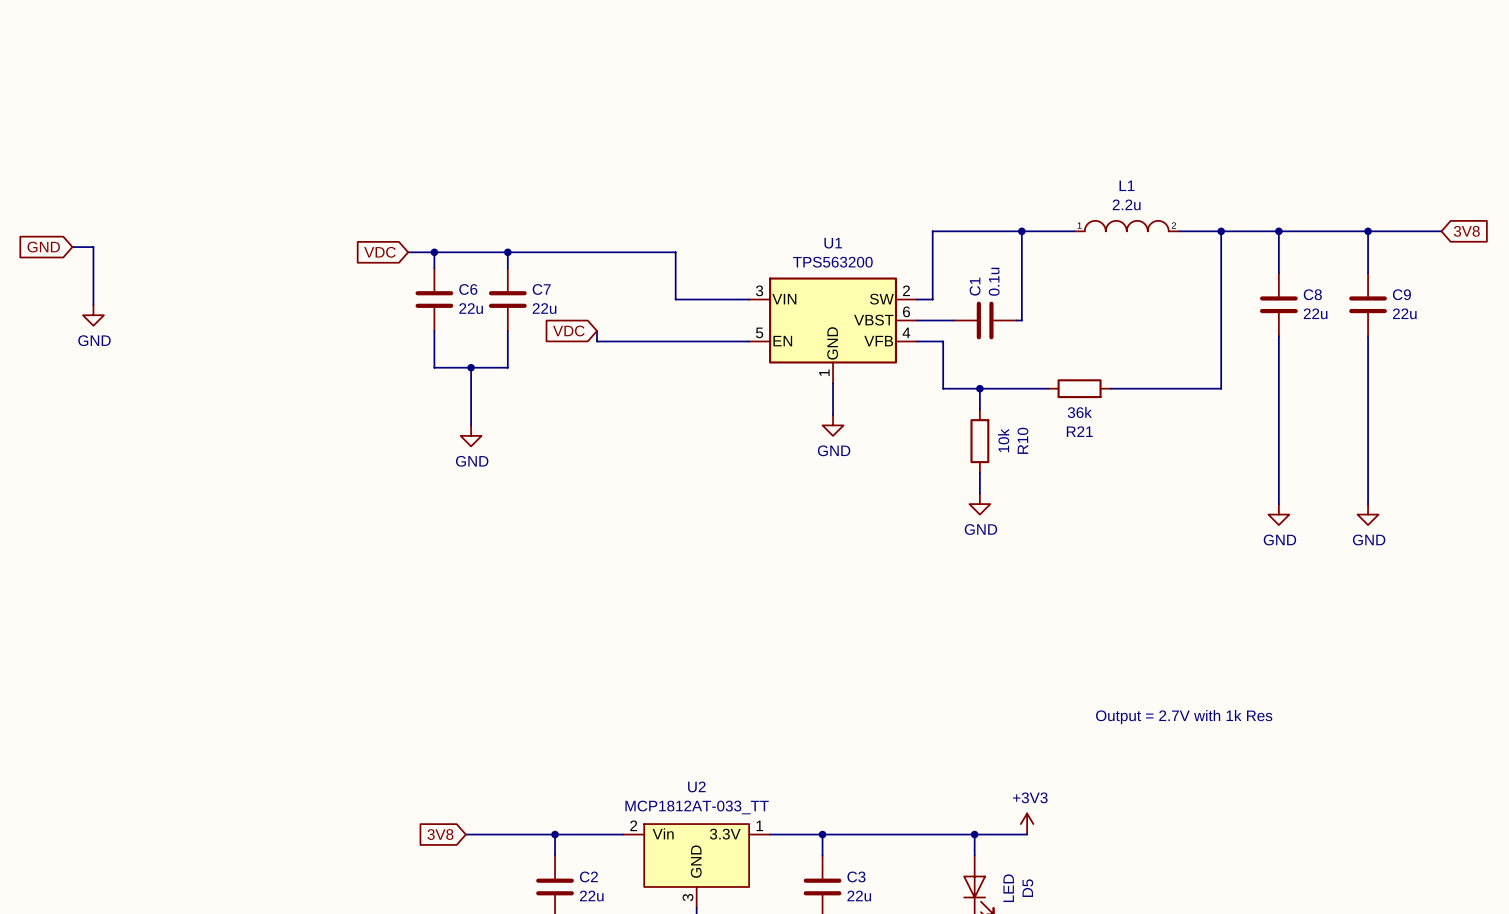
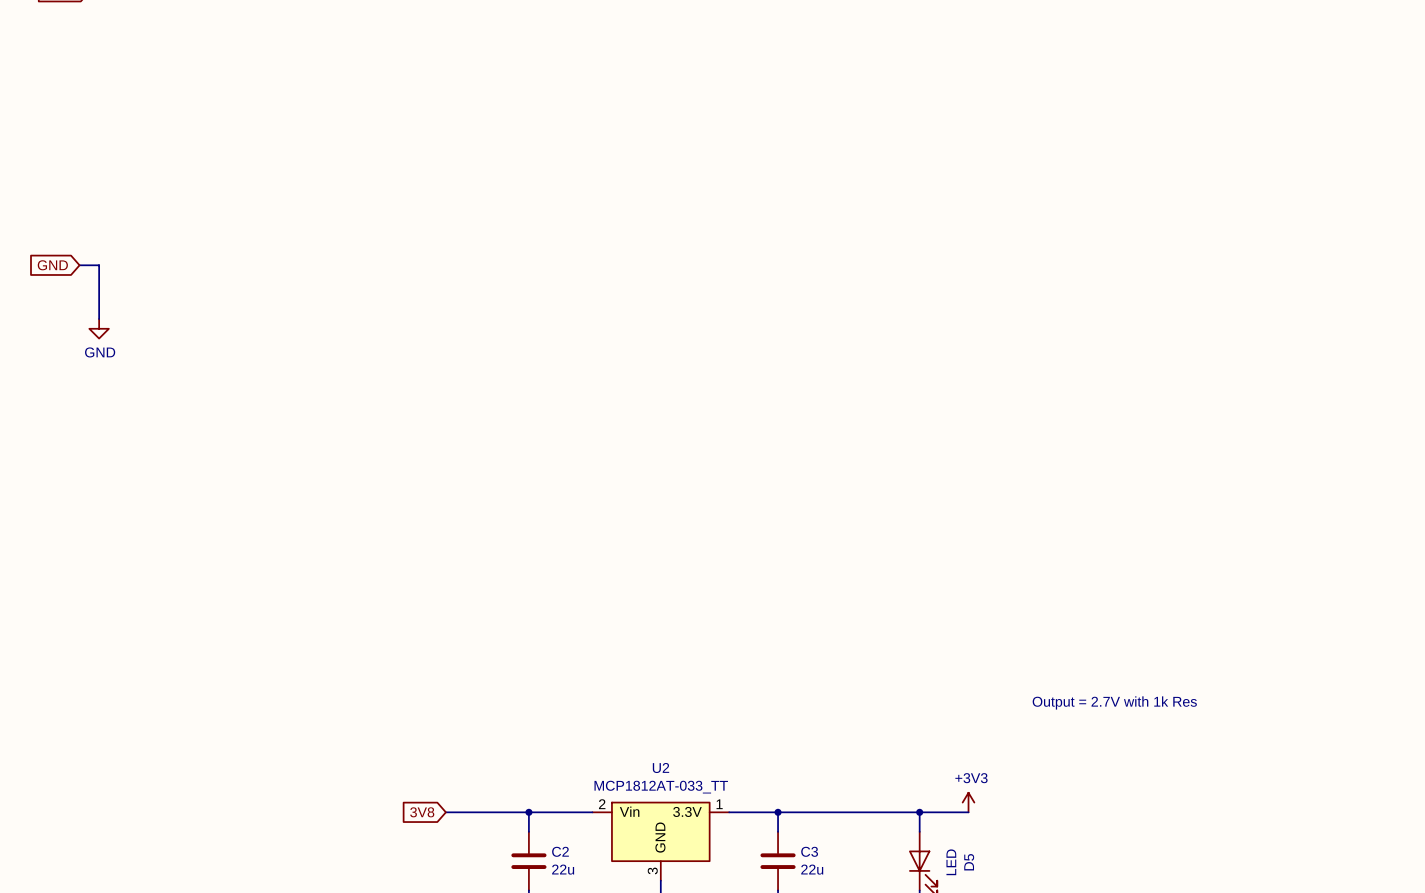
L1: 2.2u (1126, 226) -> none
wire: (1021, 231) (1021, 320) (1016, 320) -> none
junction: (1021, 231) -> none
wire: (1074, 231) (932, 231) (932, 299) (916, 299) -> none
wire: (1179, 231) (1441, 231) -> none
wire: (1221, 231) (1221, 388) (1111, 388) -> none
junction: (1221, 231) -> none
wire: (1278, 231) (1278, 273) -> none
junction: (1278, 231) -> none
wire: (1368, 231) (1368, 273) -> none
junction: (1368, 231) -> none
global label: 3V8 (1466, 231) -> none
global label: VDC (380, 252) -> none
wire: (408, 252) (675, 252) (675, 299) (749, 299) -> none
wire: (434, 252) (434, 268) -> none
junction: (434, 252) -> none
wire: (507, 252) (507, 268) -> none
junction: (507, 252) -> none
C6: 22u (434, 299) -> none
C7: 22u (507, 299) -> none
C8: 22u (1278, 304) -> none
C9: 22u (1368, 304) -> none
wire: (916, 320) (953, 320) -> none
C1: 0.1u (985, 320) -> none
wire: (434, 330) (434, 367) (507, 367) (507, 330) -> none
global label: VDC (568, 330) -> none
wire: (596, 330) (596, 341) (749, 341) -> none
U1: TPS563200 (833, 330) -> none
wire: (1278, 336) (1278, 504) -> none
wire: (1368, 336) (1368, 504) -> none
wire: (916, 341) (943, 341) (943, 388) (1048, 388) -> none
wire: (471, 367) (471, 425) -> none
junction: (471, 367) -> none
wire: (833, 383) (833, 414) -> none
wire: (979, 388) (979, 409) -> none
junction: (979, 388) -> none
R21: 36k (1079, 388) -> none
power symbol: GND (833, 425) -> none
power symbol: GND (471, 435) -> none
R10: 10k (979, 441) -> none
wire: (979, 472) (979, 493) -> none
power symbol: GND (979, 504) -> none
power symbol: GND (1278, 514) -> none
power symbol: GND (1368, 514) -> none

